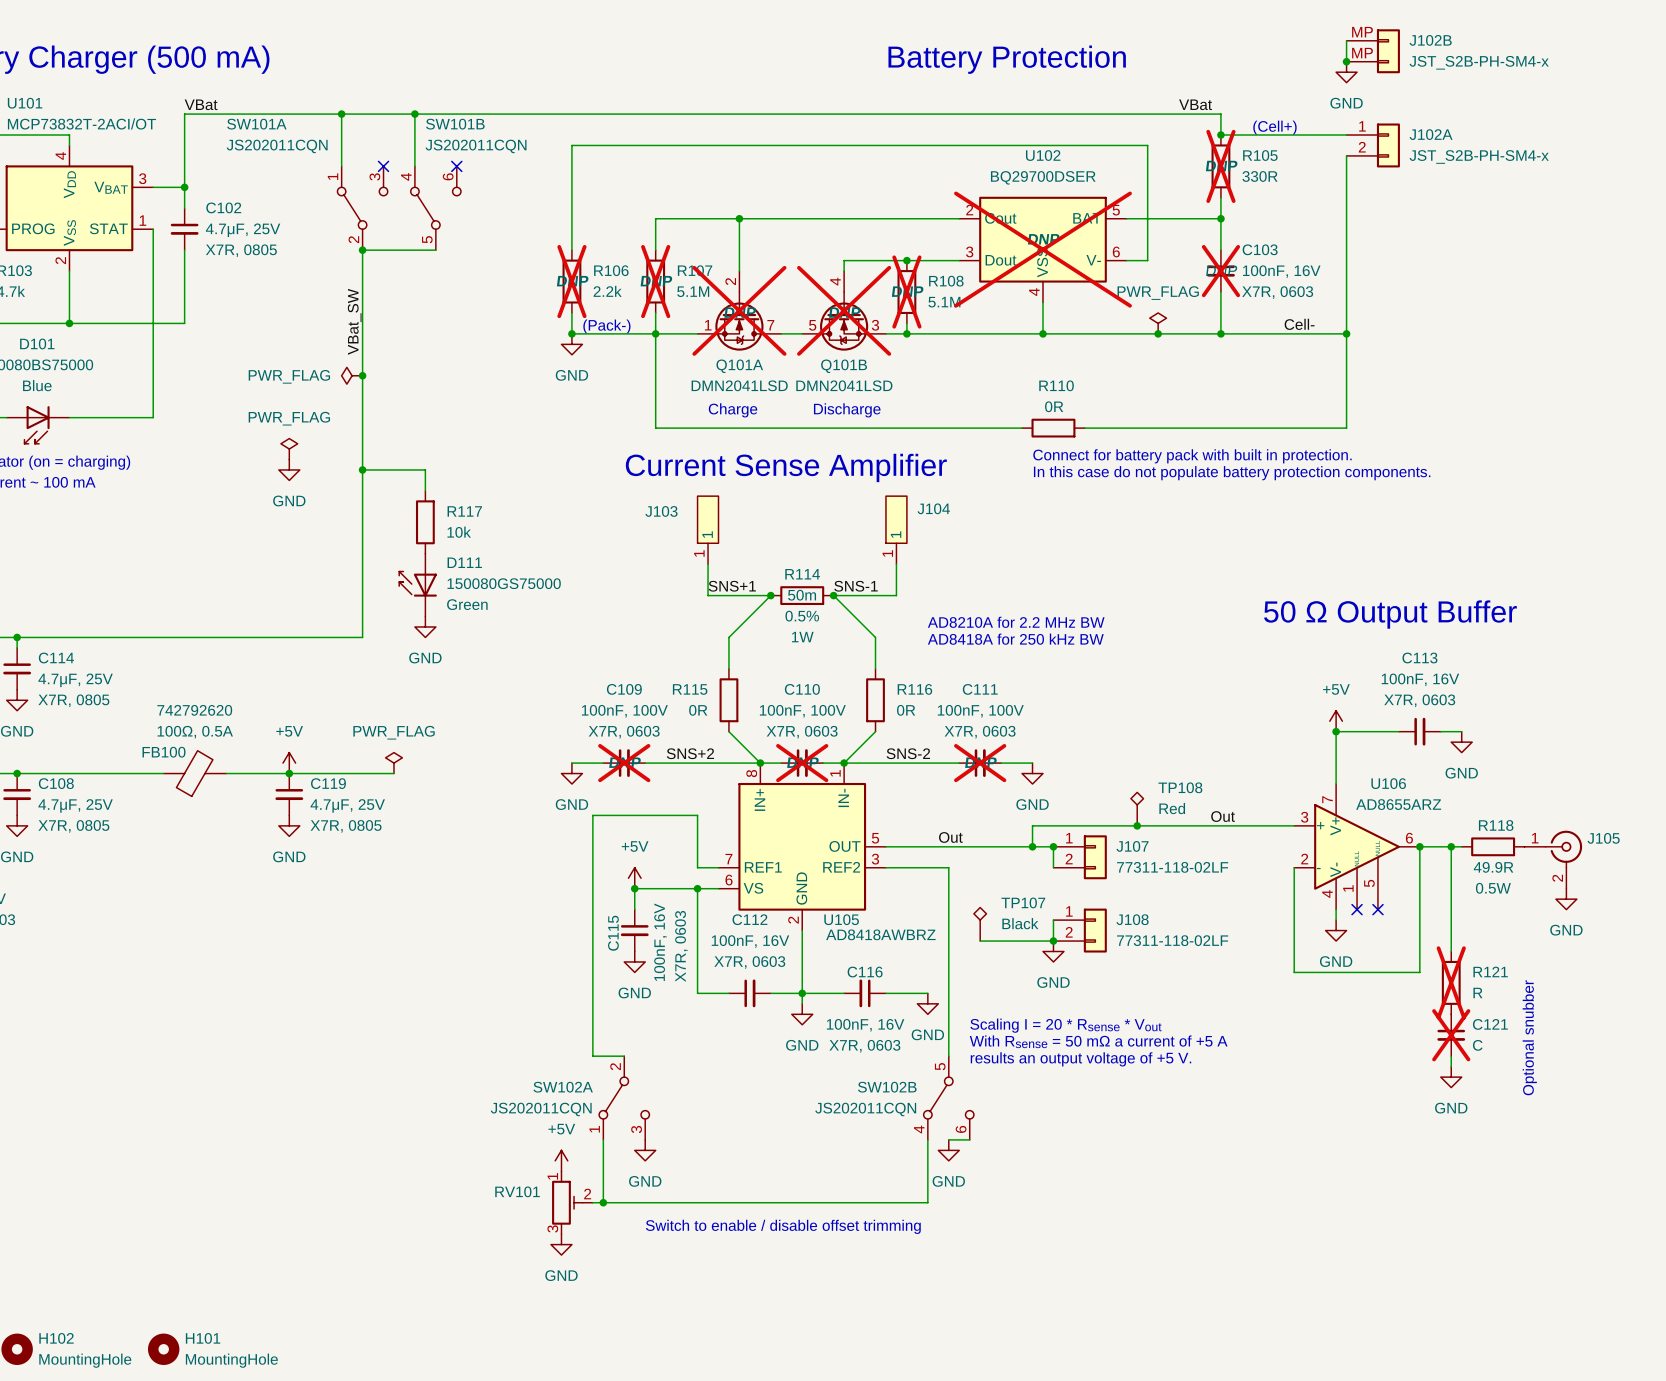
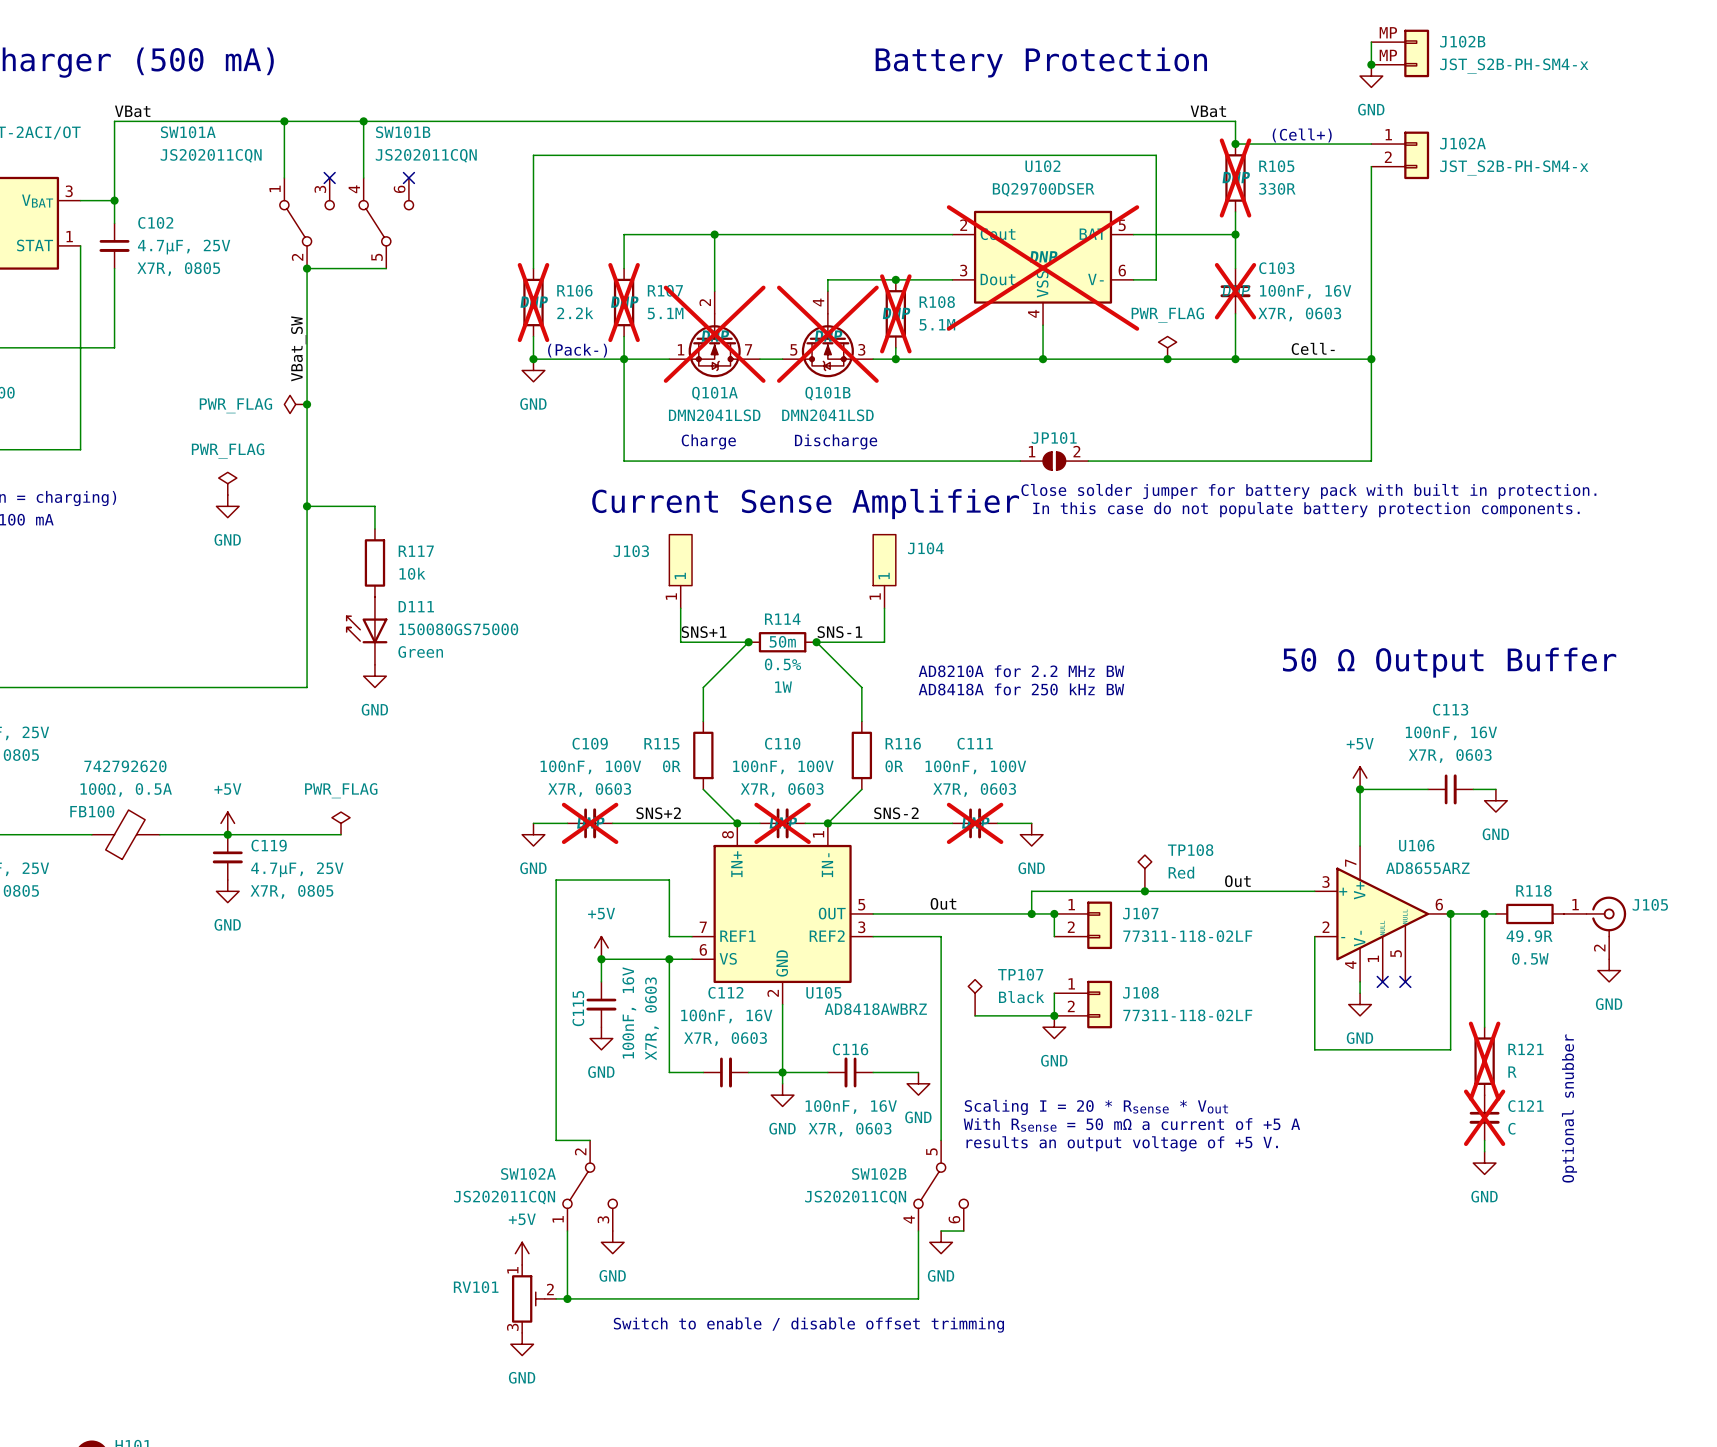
R110: (1053, 428) -> none
JP101: none -> (1054, 461)
text: Connect for battery pack with built in protection. (1192, 456) -> Close solder jumper for battery pack with built in protection. (1308, 491)

